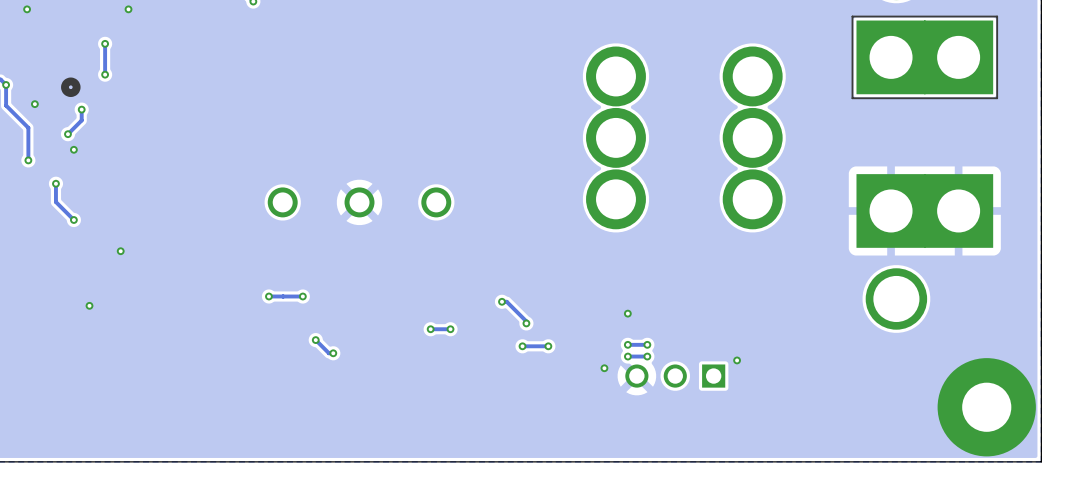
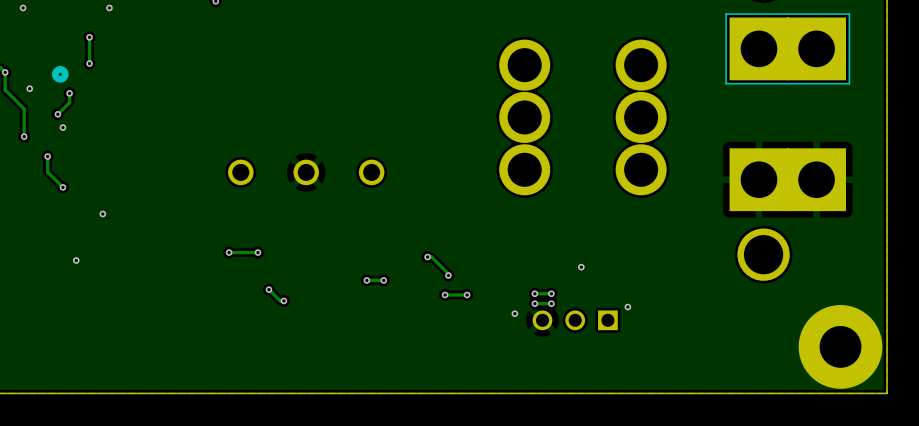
via position: (627, 313) -> (581, 267)

